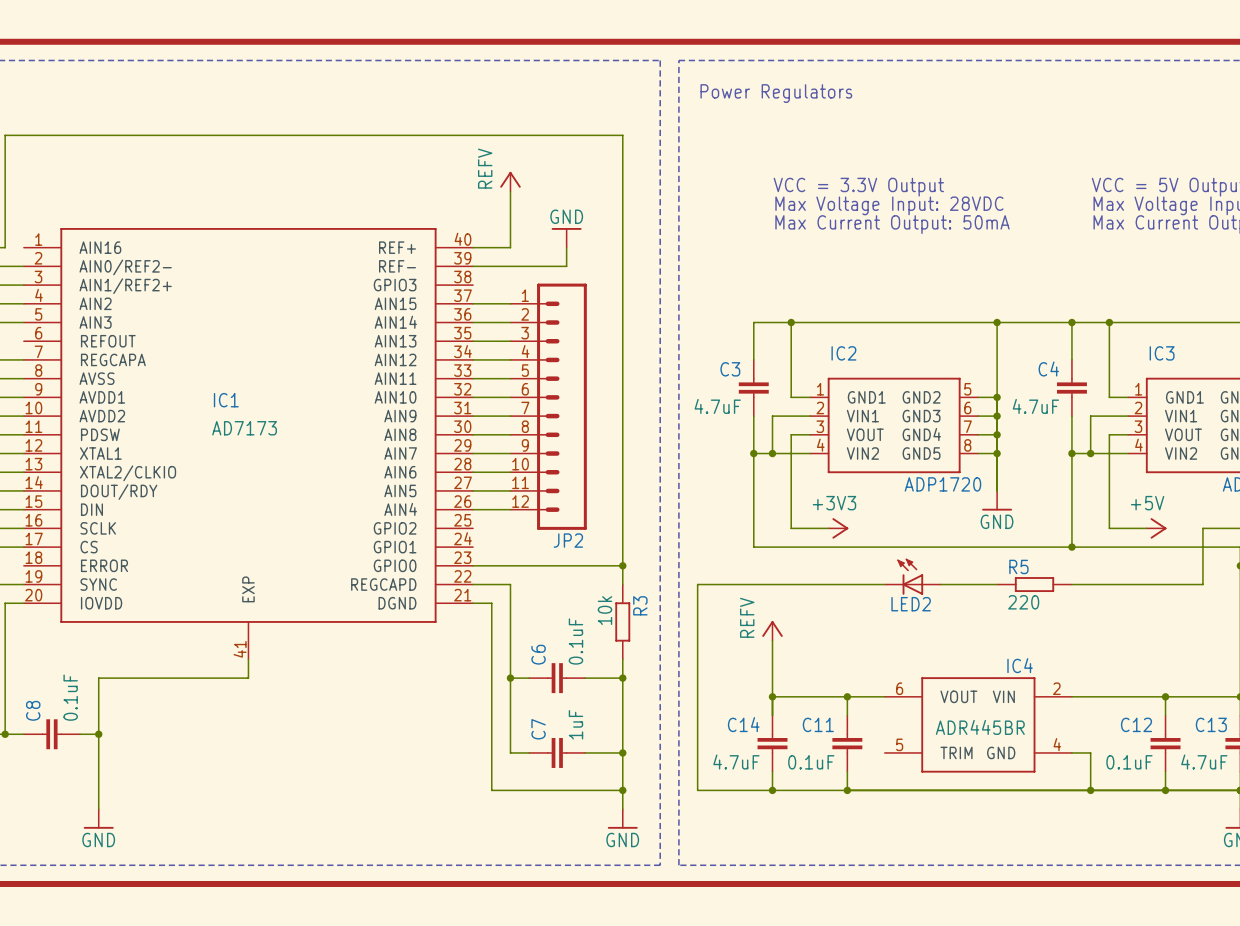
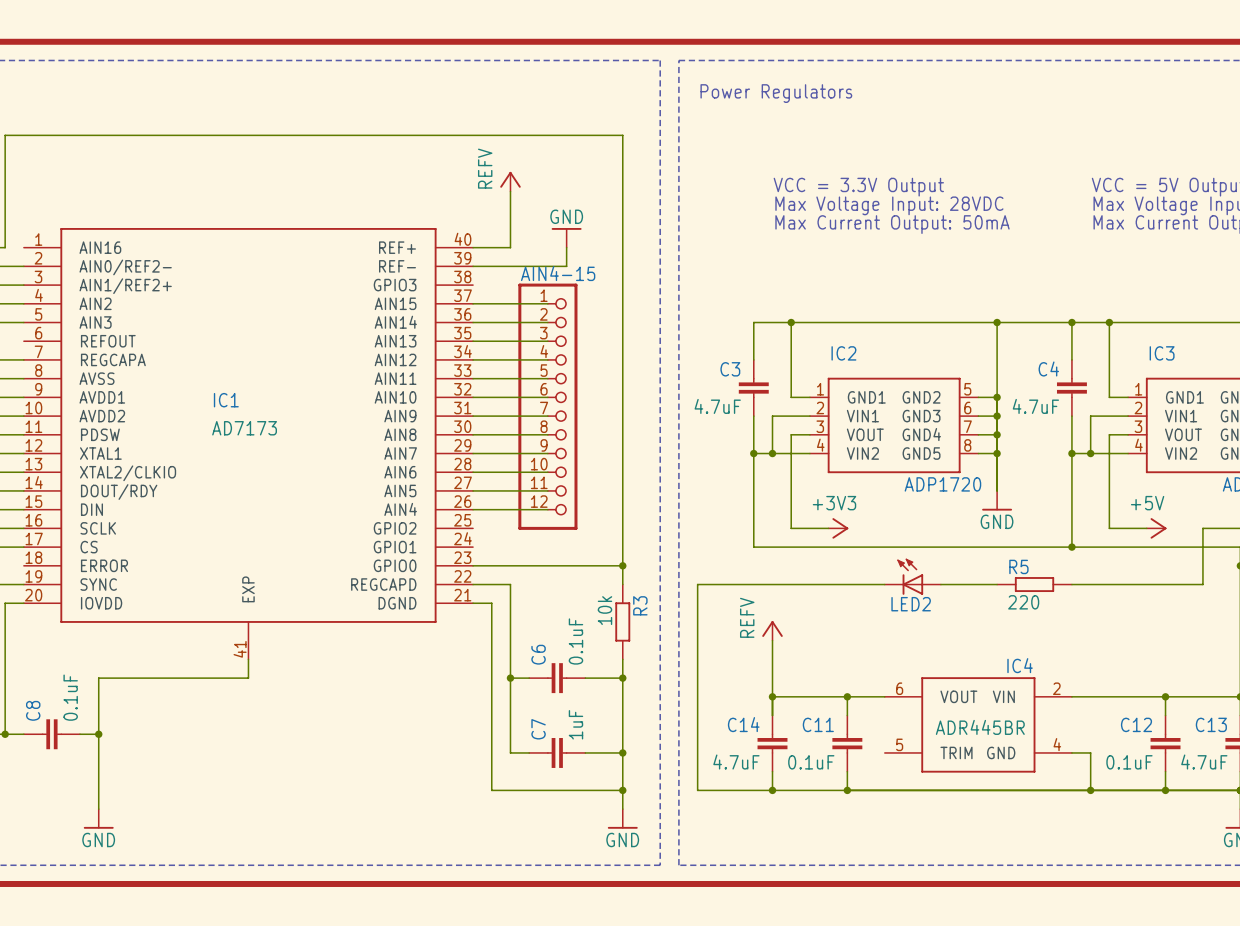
AIN4-15: none -> (547, 406)
JP2: (548, 406) -> none

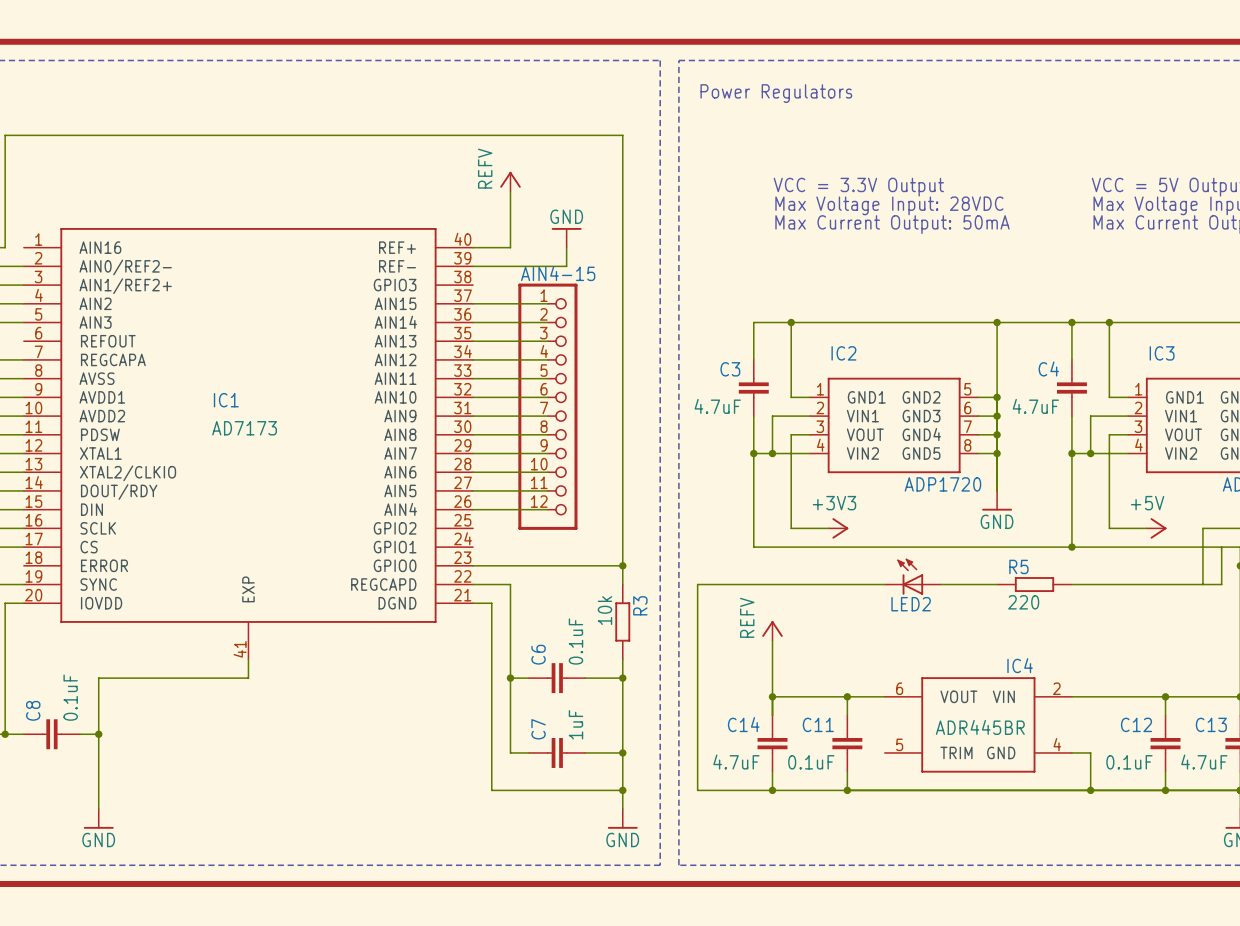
wire: none -> (1221, 547) (1221, 584) (1202, 584)

